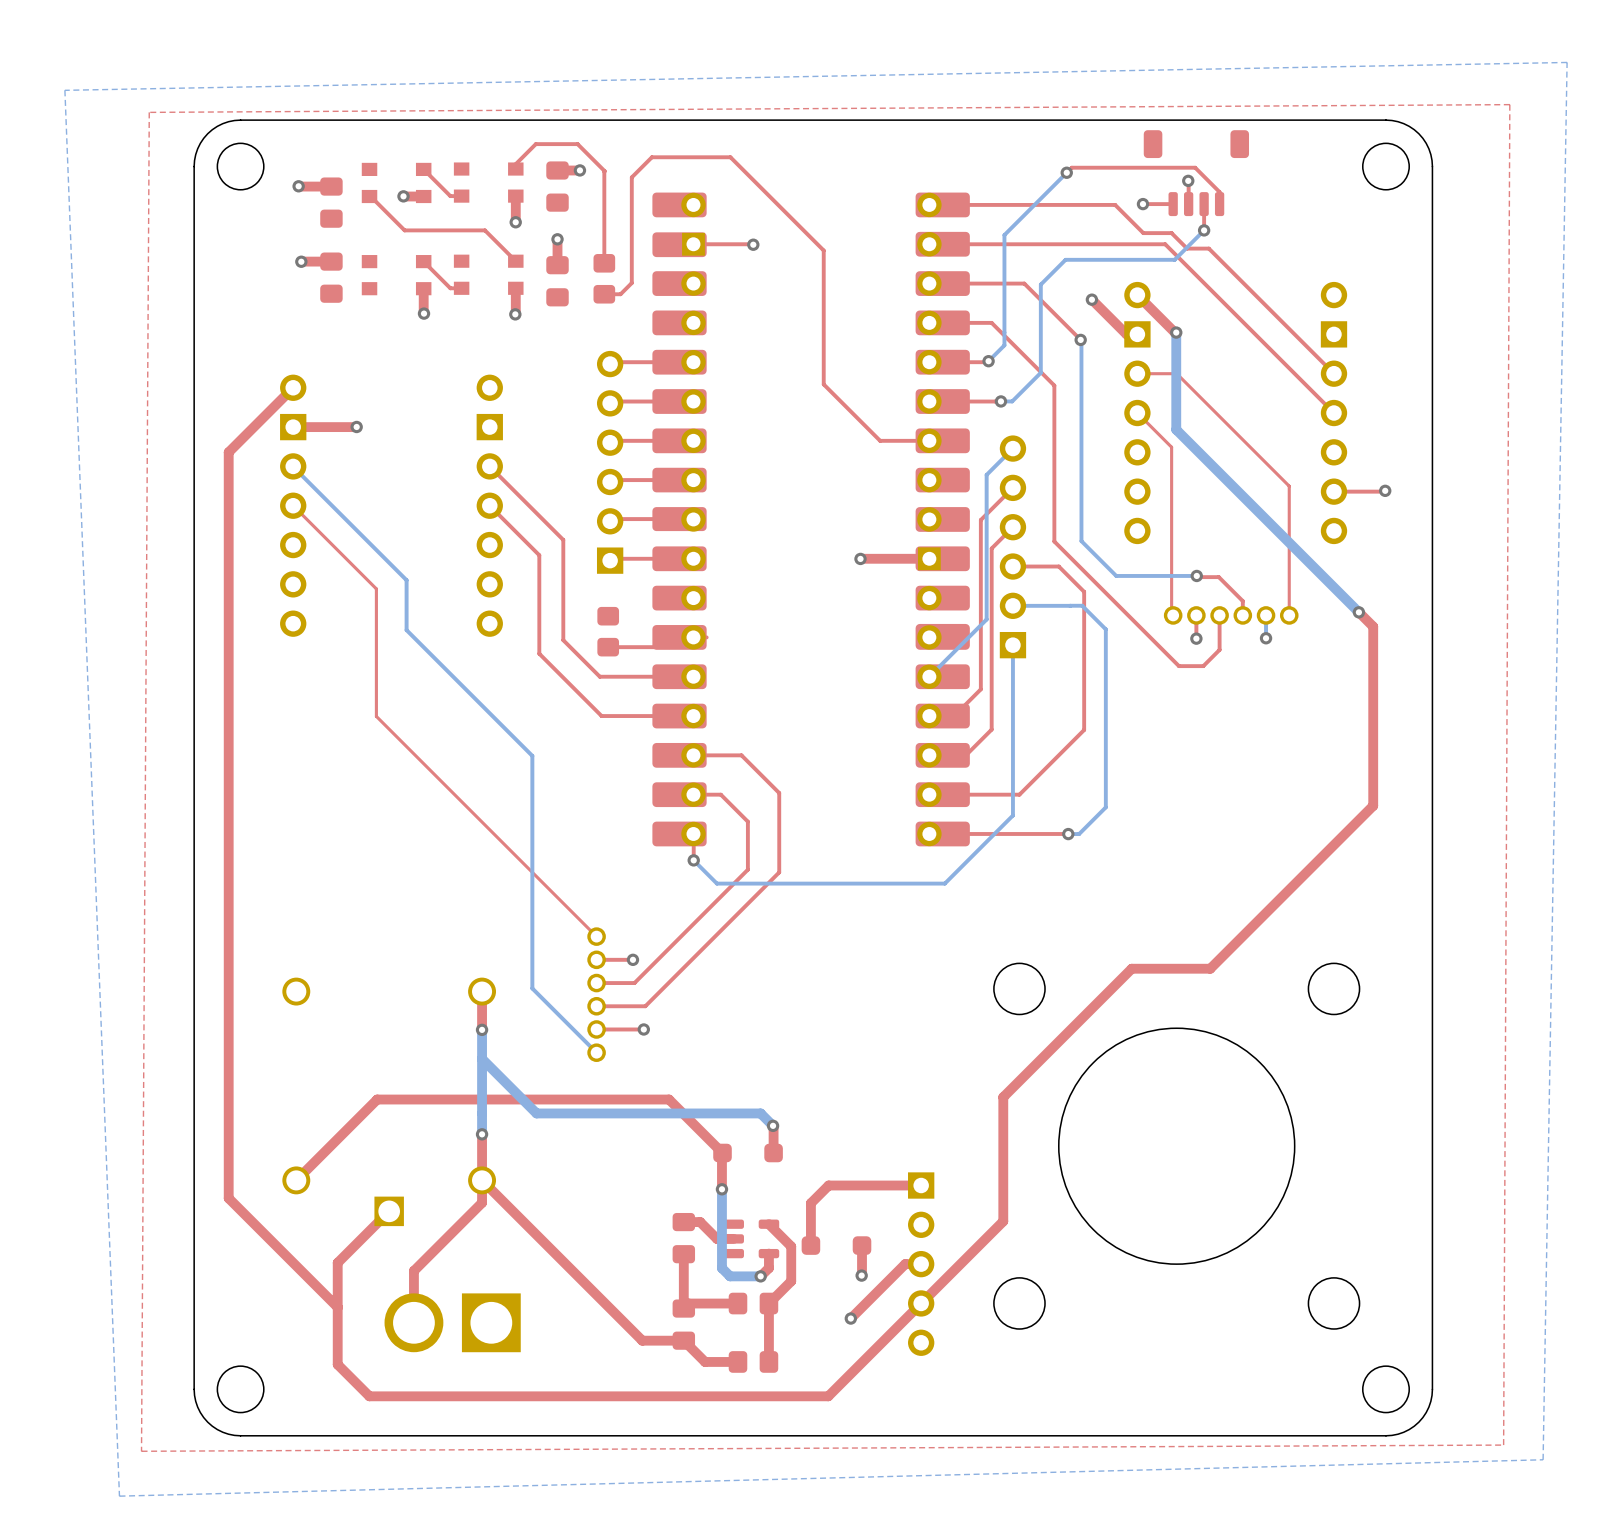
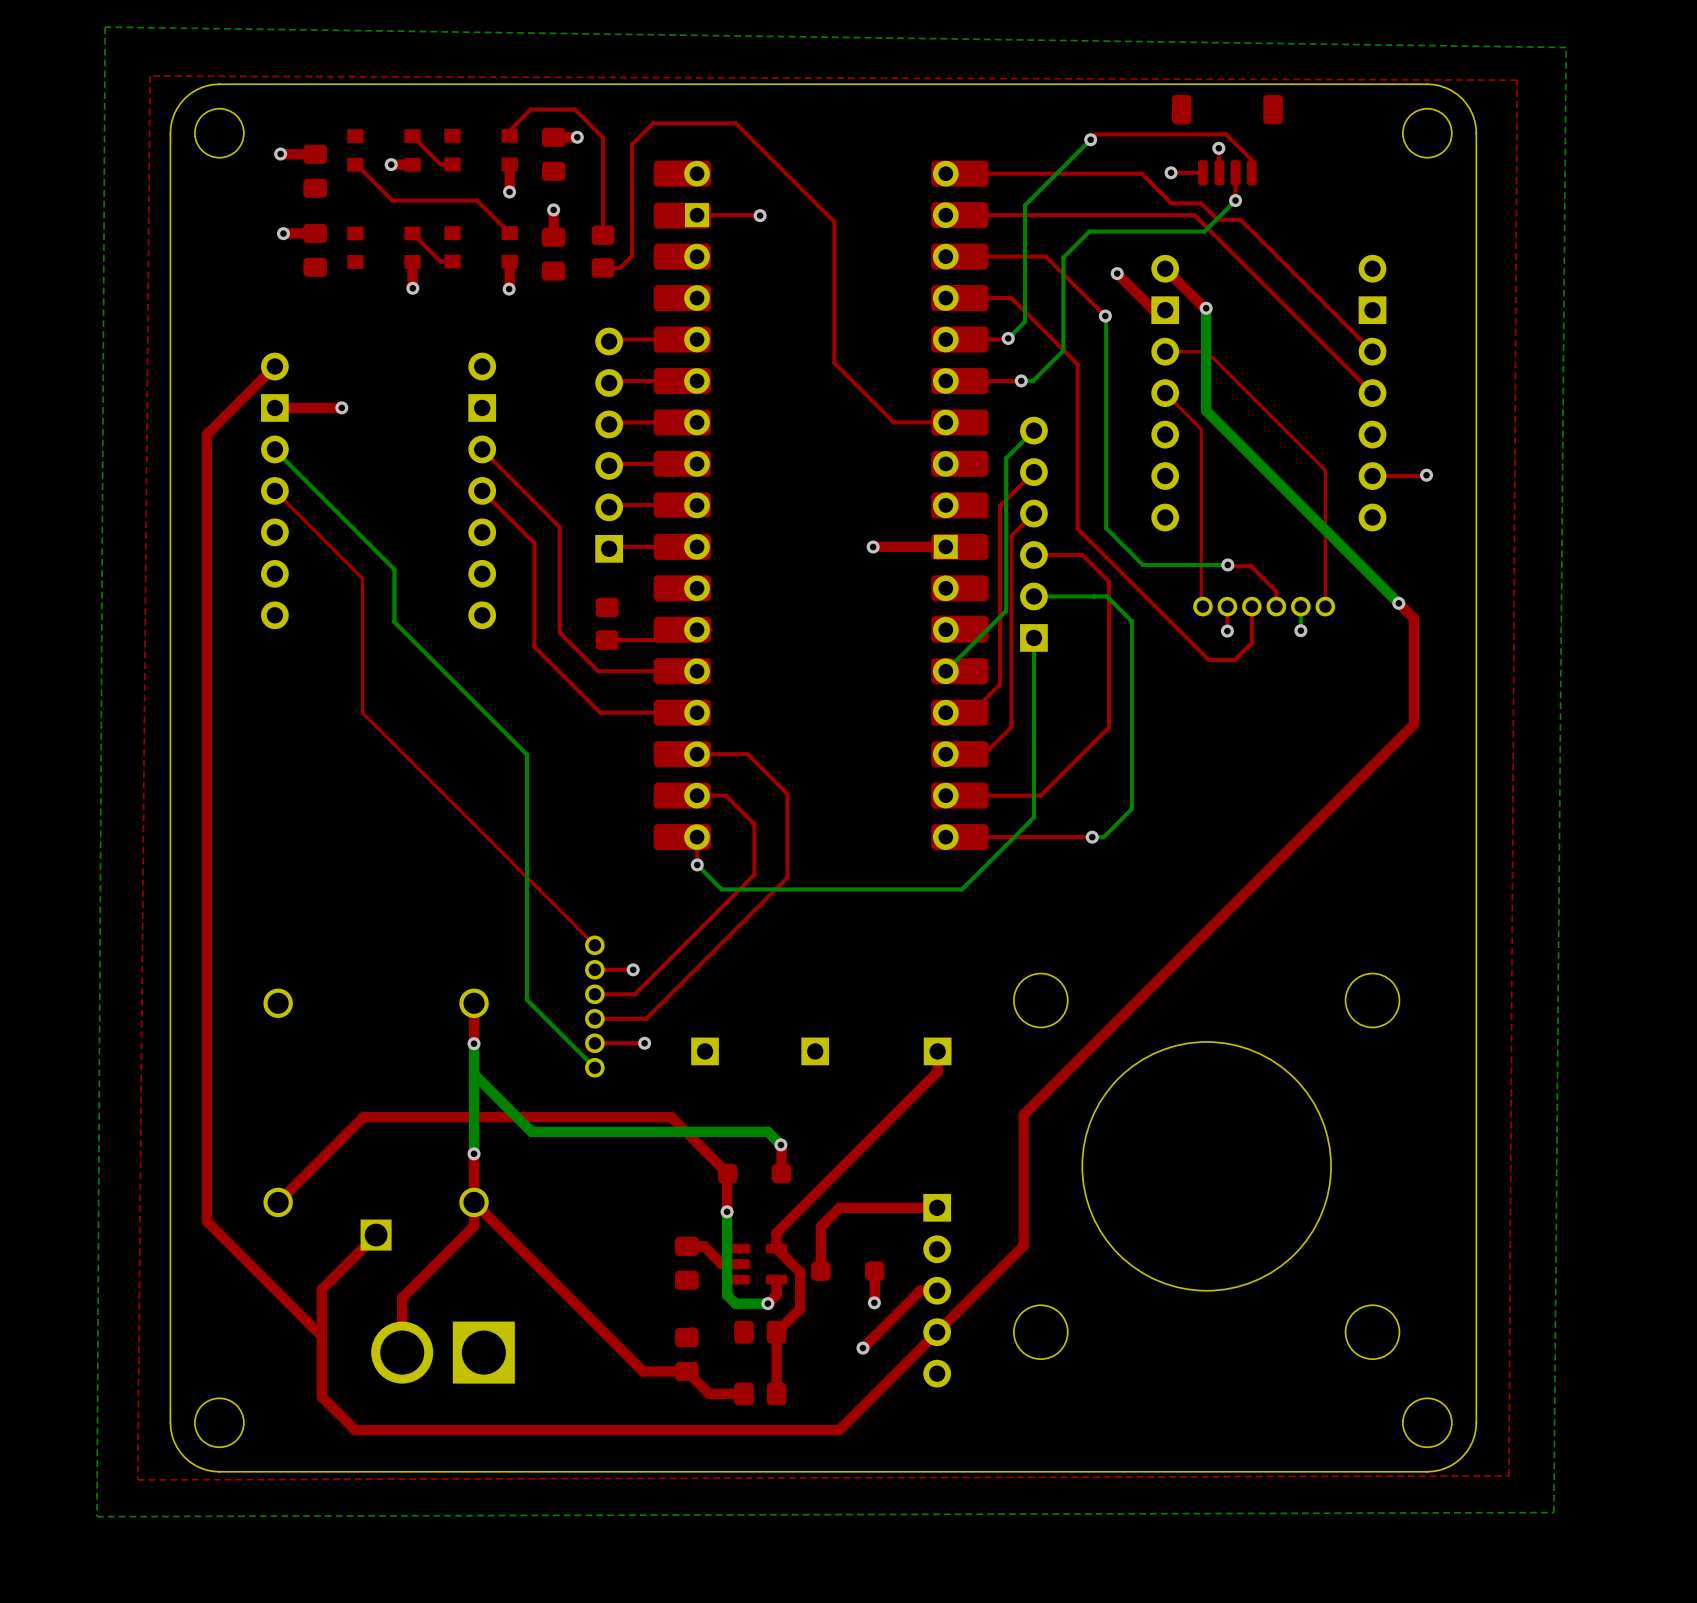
bottom zone outline: (1567, 62) (64, 90) (119, 1496) (1543, 1459) (1567, 62) -> (105, 27) (1566, 47) (1553, 1512) (96, 1516) (105, 27)
top zone outline: (1509, 104) (149, 112) (141, 1451) (1503, 1445) (1509, 104) -> (150, 76) (1517, 80) (1508, 1475) (137, 1479) (150, 76)
top track: (1373, 727) (1373, 805) (1210, 968) (1131, 968) -> (1413, 724) (1159, 979)
part: none -> (705, 1051)
part: none -> (815, 1051)
top track: none -> (937, 1051) (937, 1071) (776, 1232) (776, 1248)
part: none -> (937, 1051)
top track: (683, 1254) (683, 1308) -> none
top track: (737, 1303) (688, 1303) -> none

